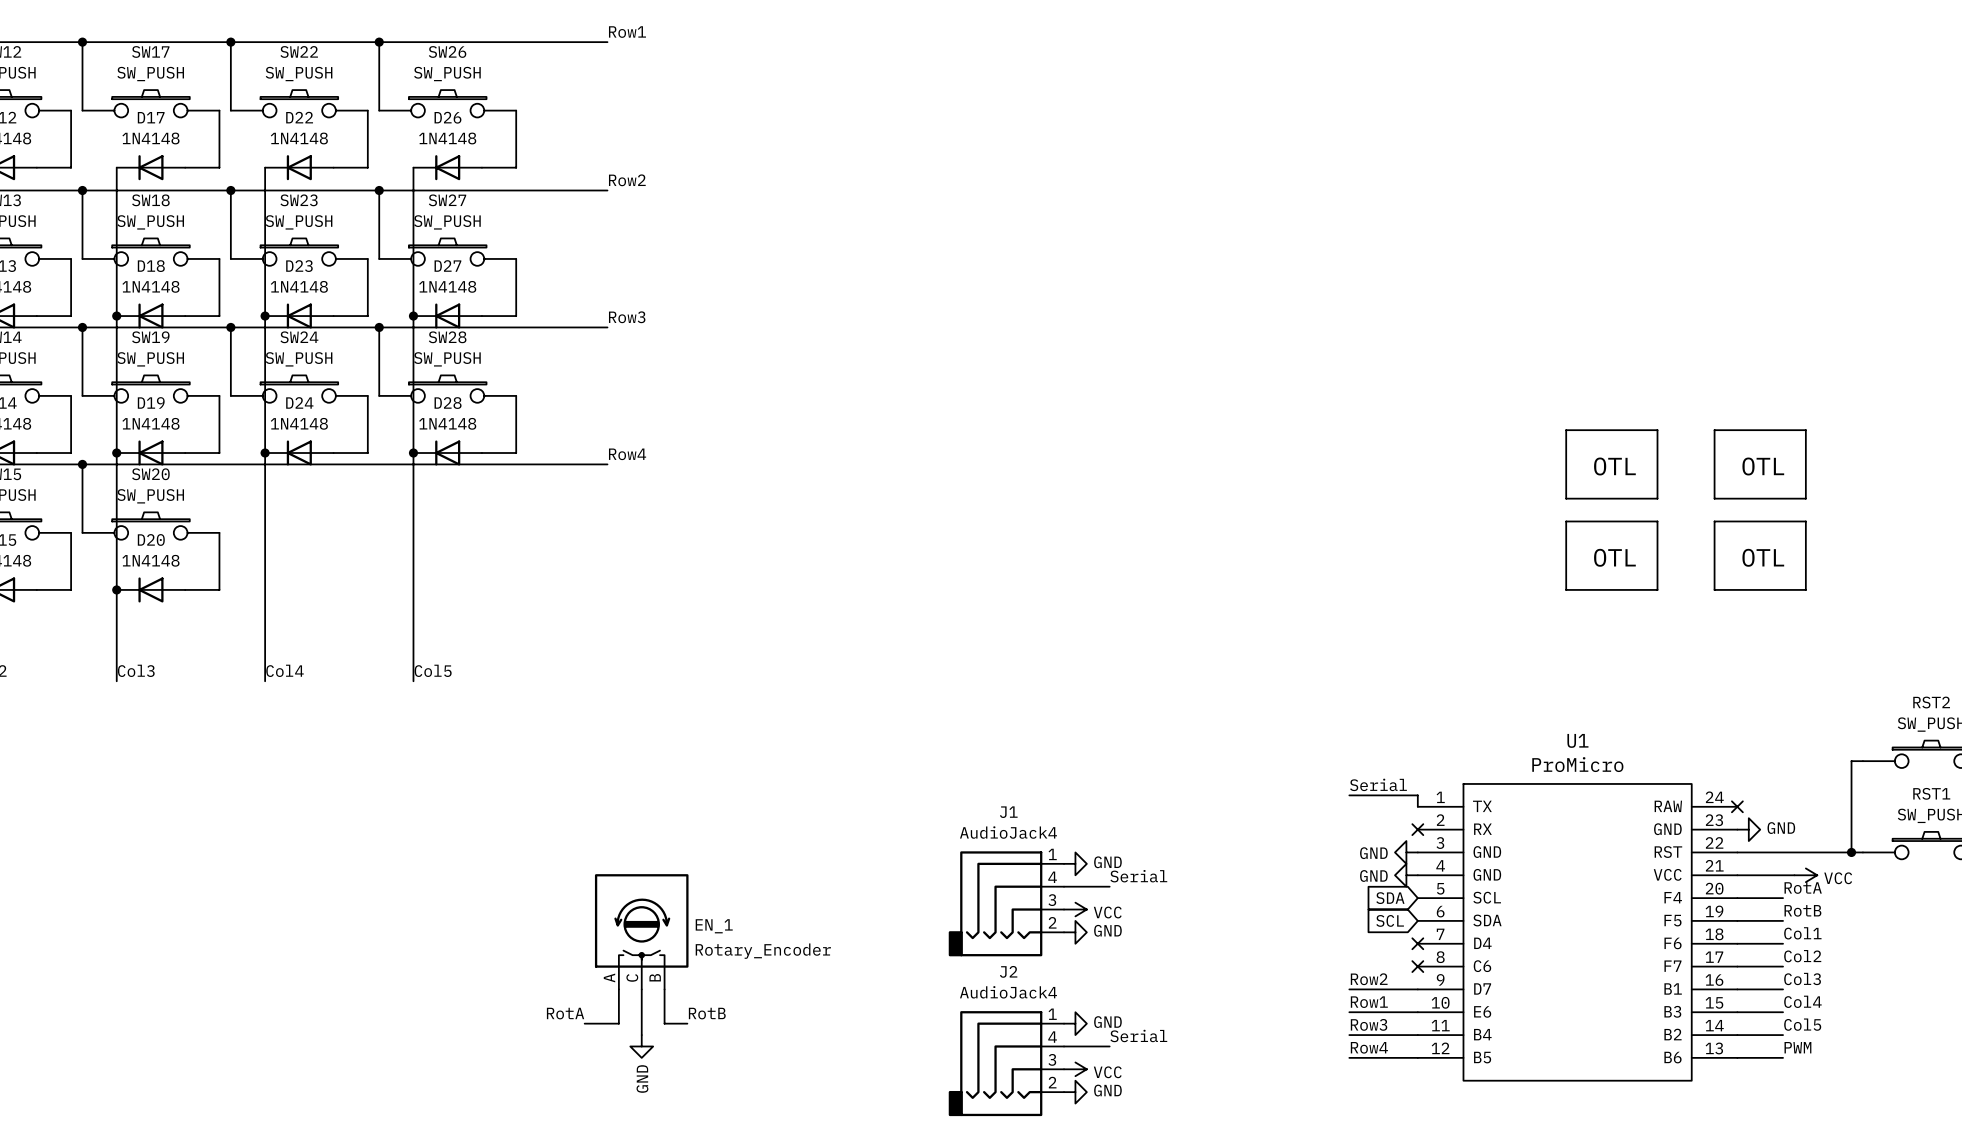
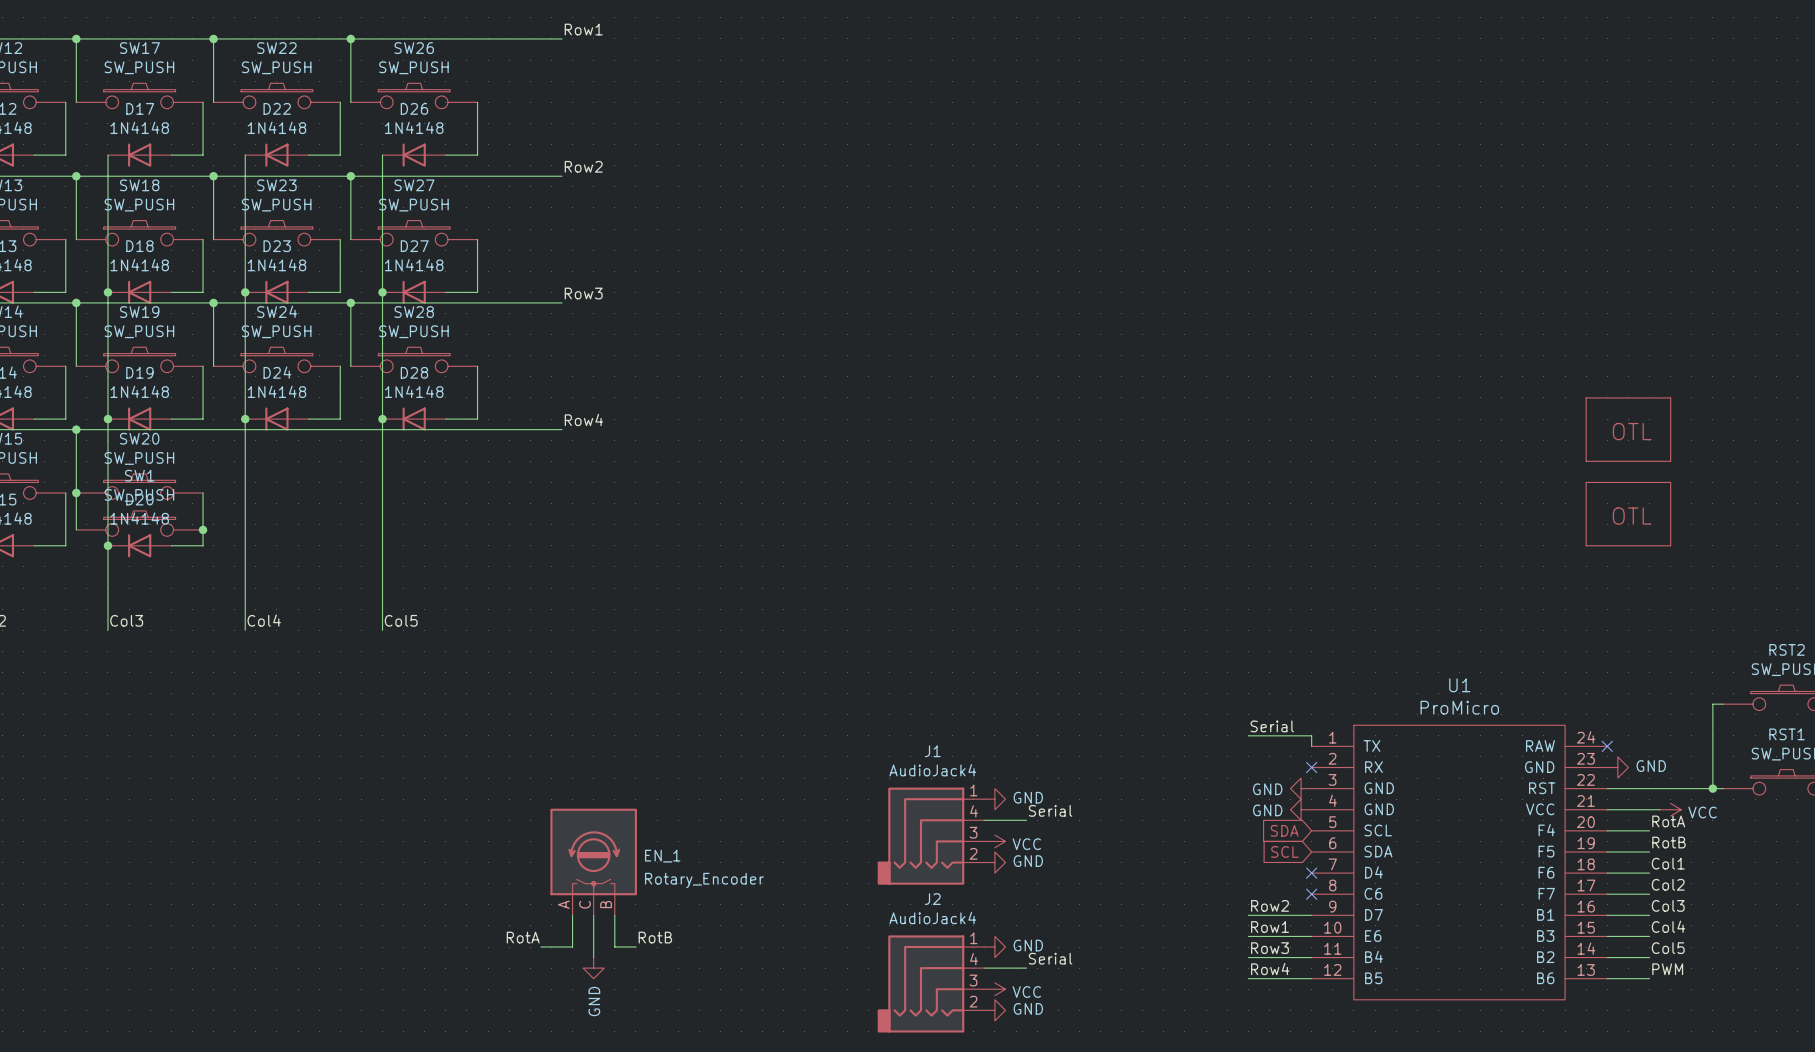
part: (1611, 464) -> none
wire: none -> (76, 492) (76, 529)
junction: none -> (76, 492)
part: (1611, 555) -> none
SW1: none -> SW_PUSH (139, 523)
junction: none -> (203, 529)

